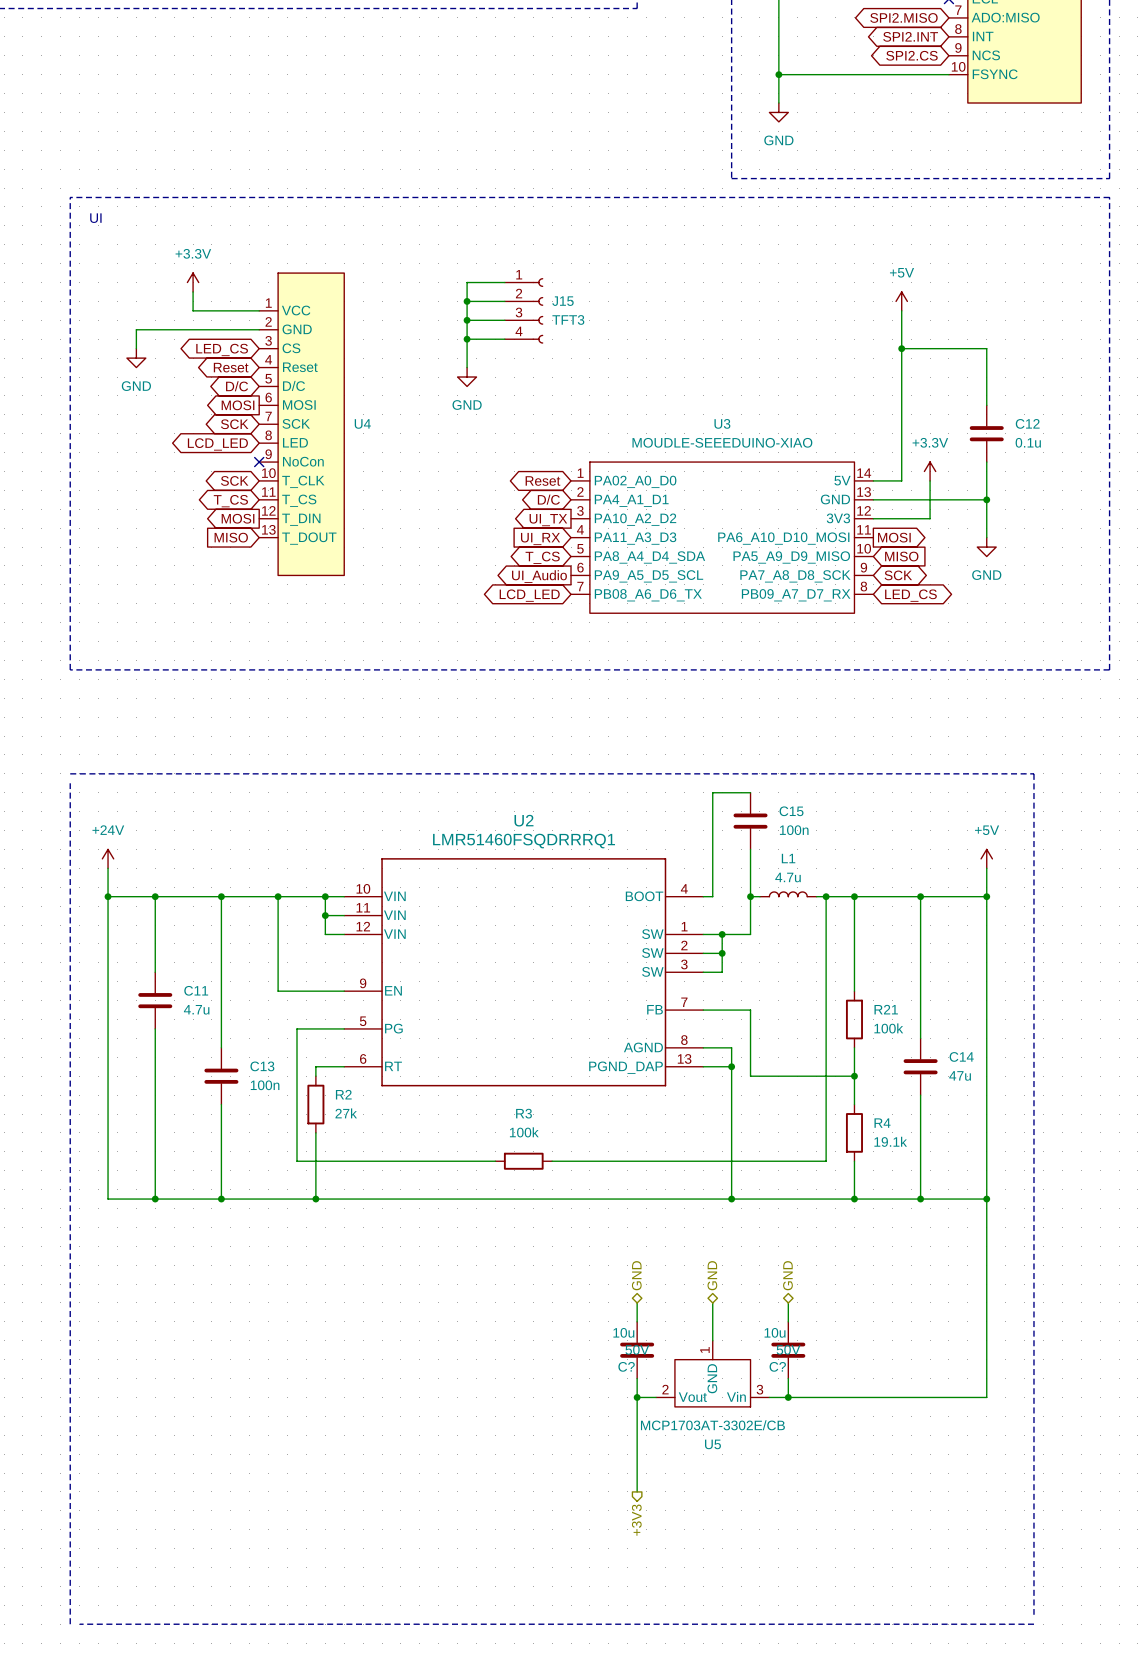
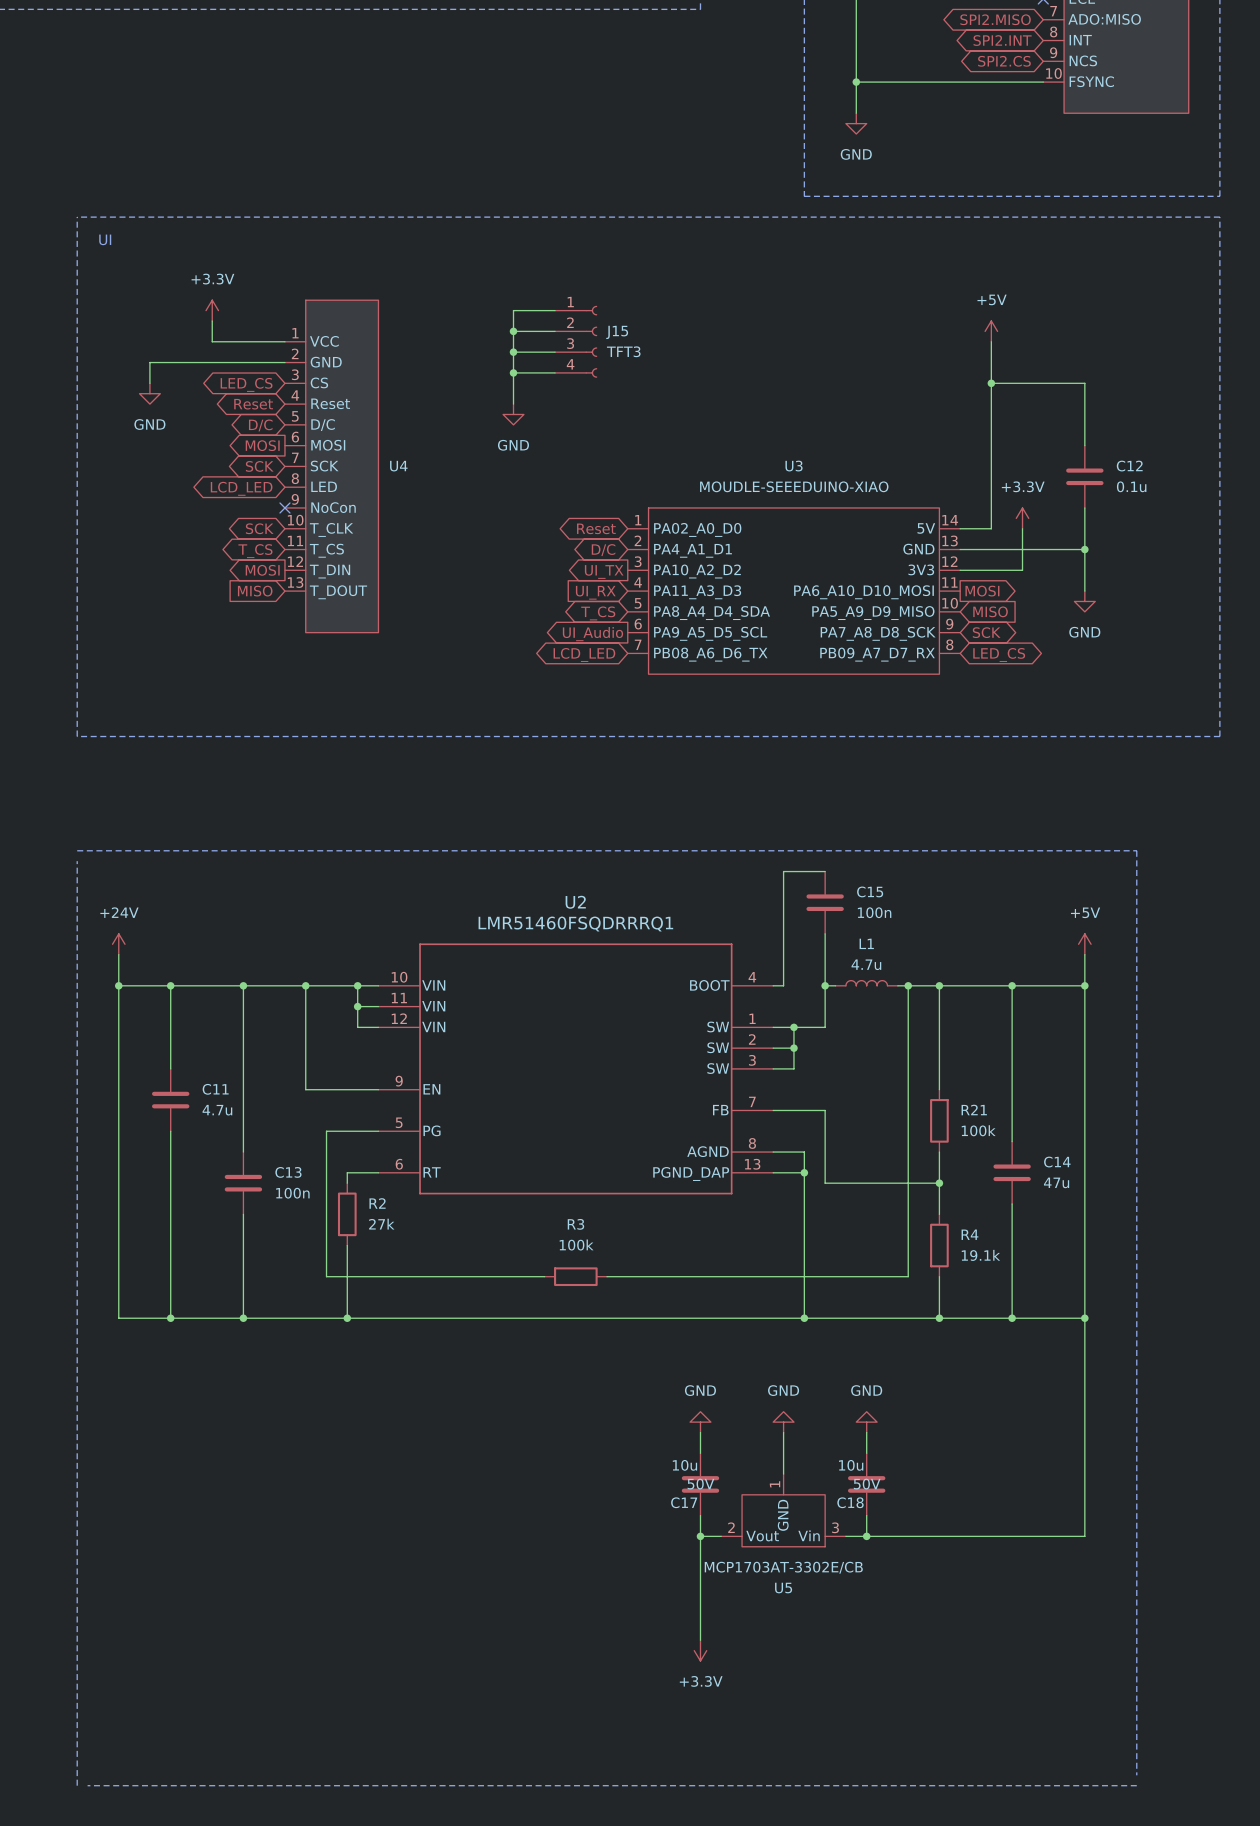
hierarchical label: GND (636, 1275) -> none
hierarchical label: GND (712, 1275) -> none
hierarchical label: GND (787, 1275) -> none
power symbol: none -> GND (700, 1422)
power symbol: none -> GND (783, 1422)
power symbol: none -> GND (866, 1422)
C? name: C? (626, 1366) -> C17 (684, 1502)
C? name: C? (777, 1366) -> C18 (850, 1502)
power symbol: none -> +3.3V (700, 1650)
hierarchical label: +3V3 (636, 1520) -> none

